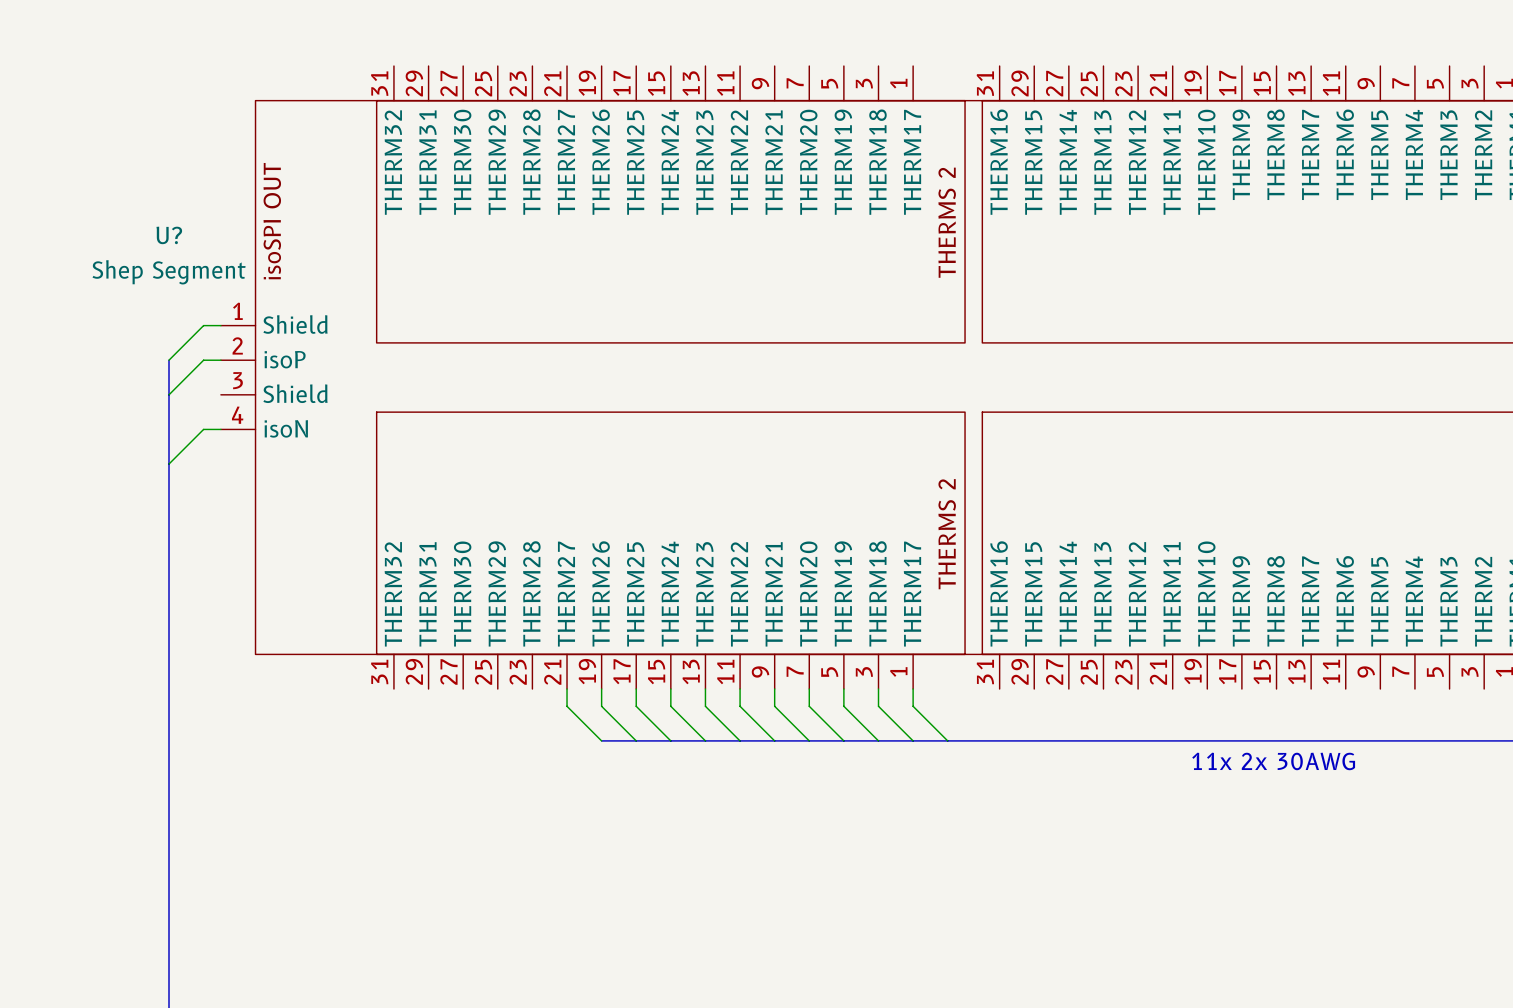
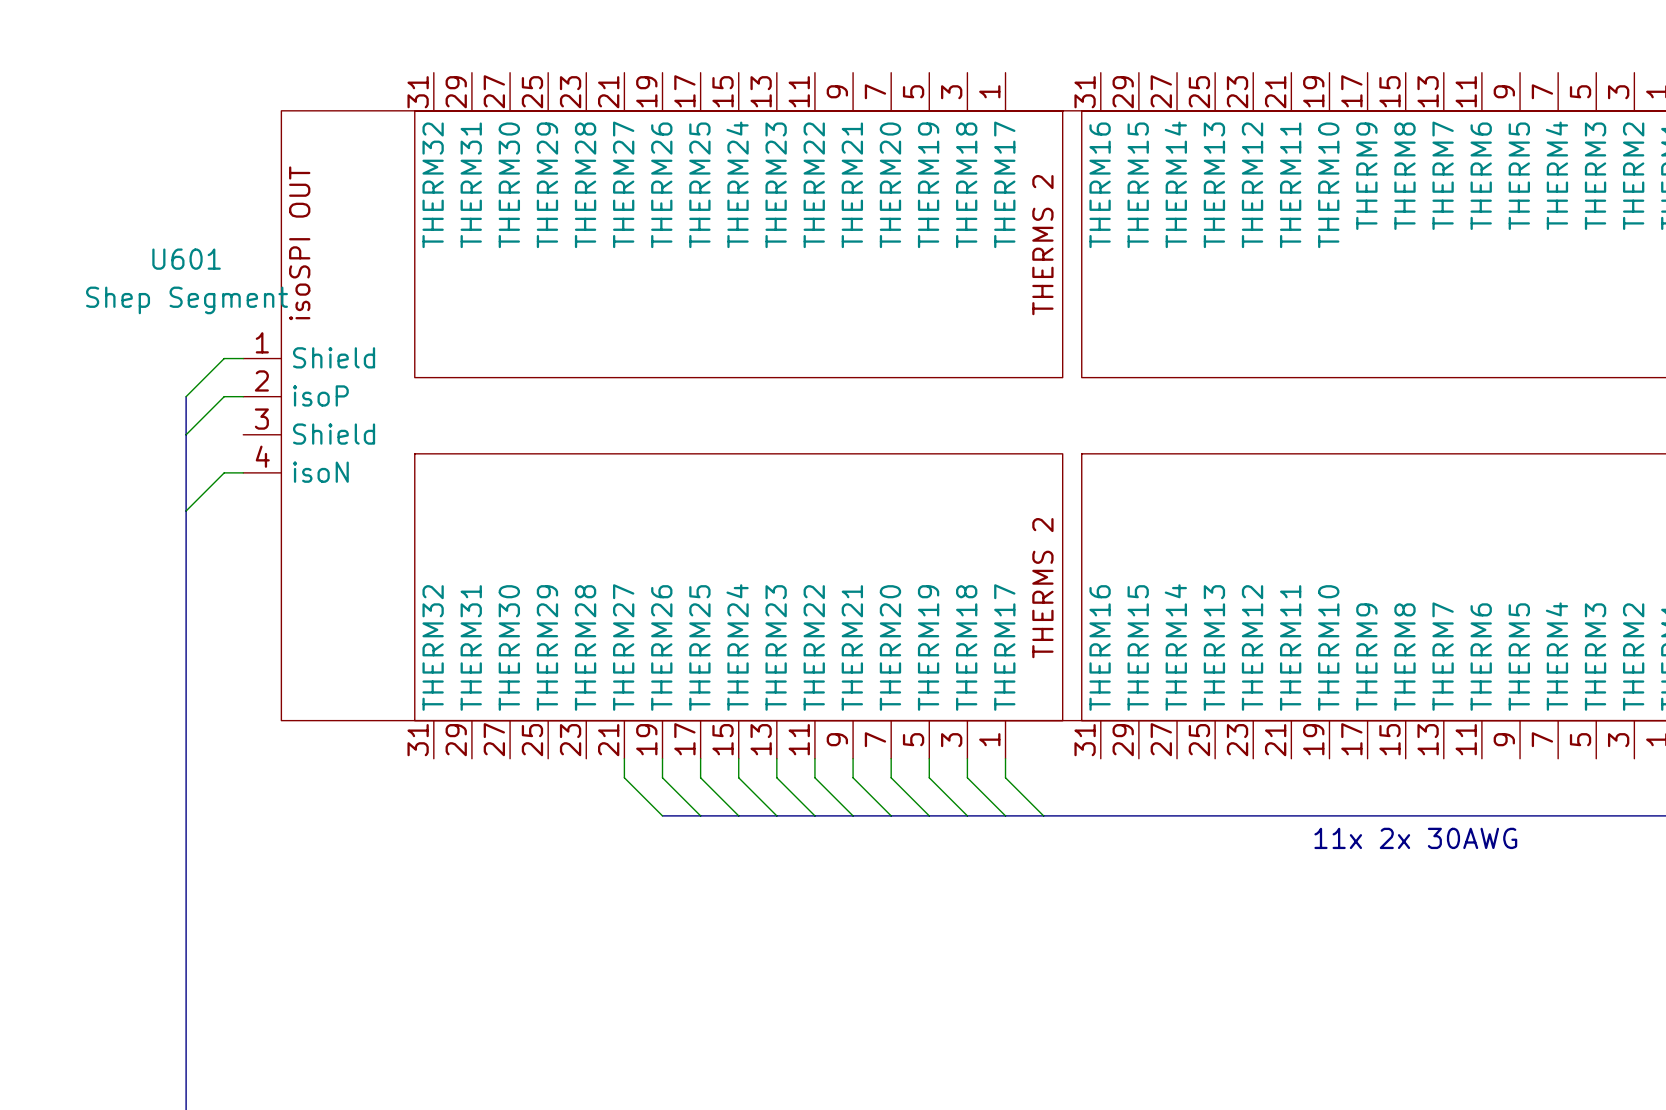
U? name: U? (169, 235) -> U601 (186, 259)

